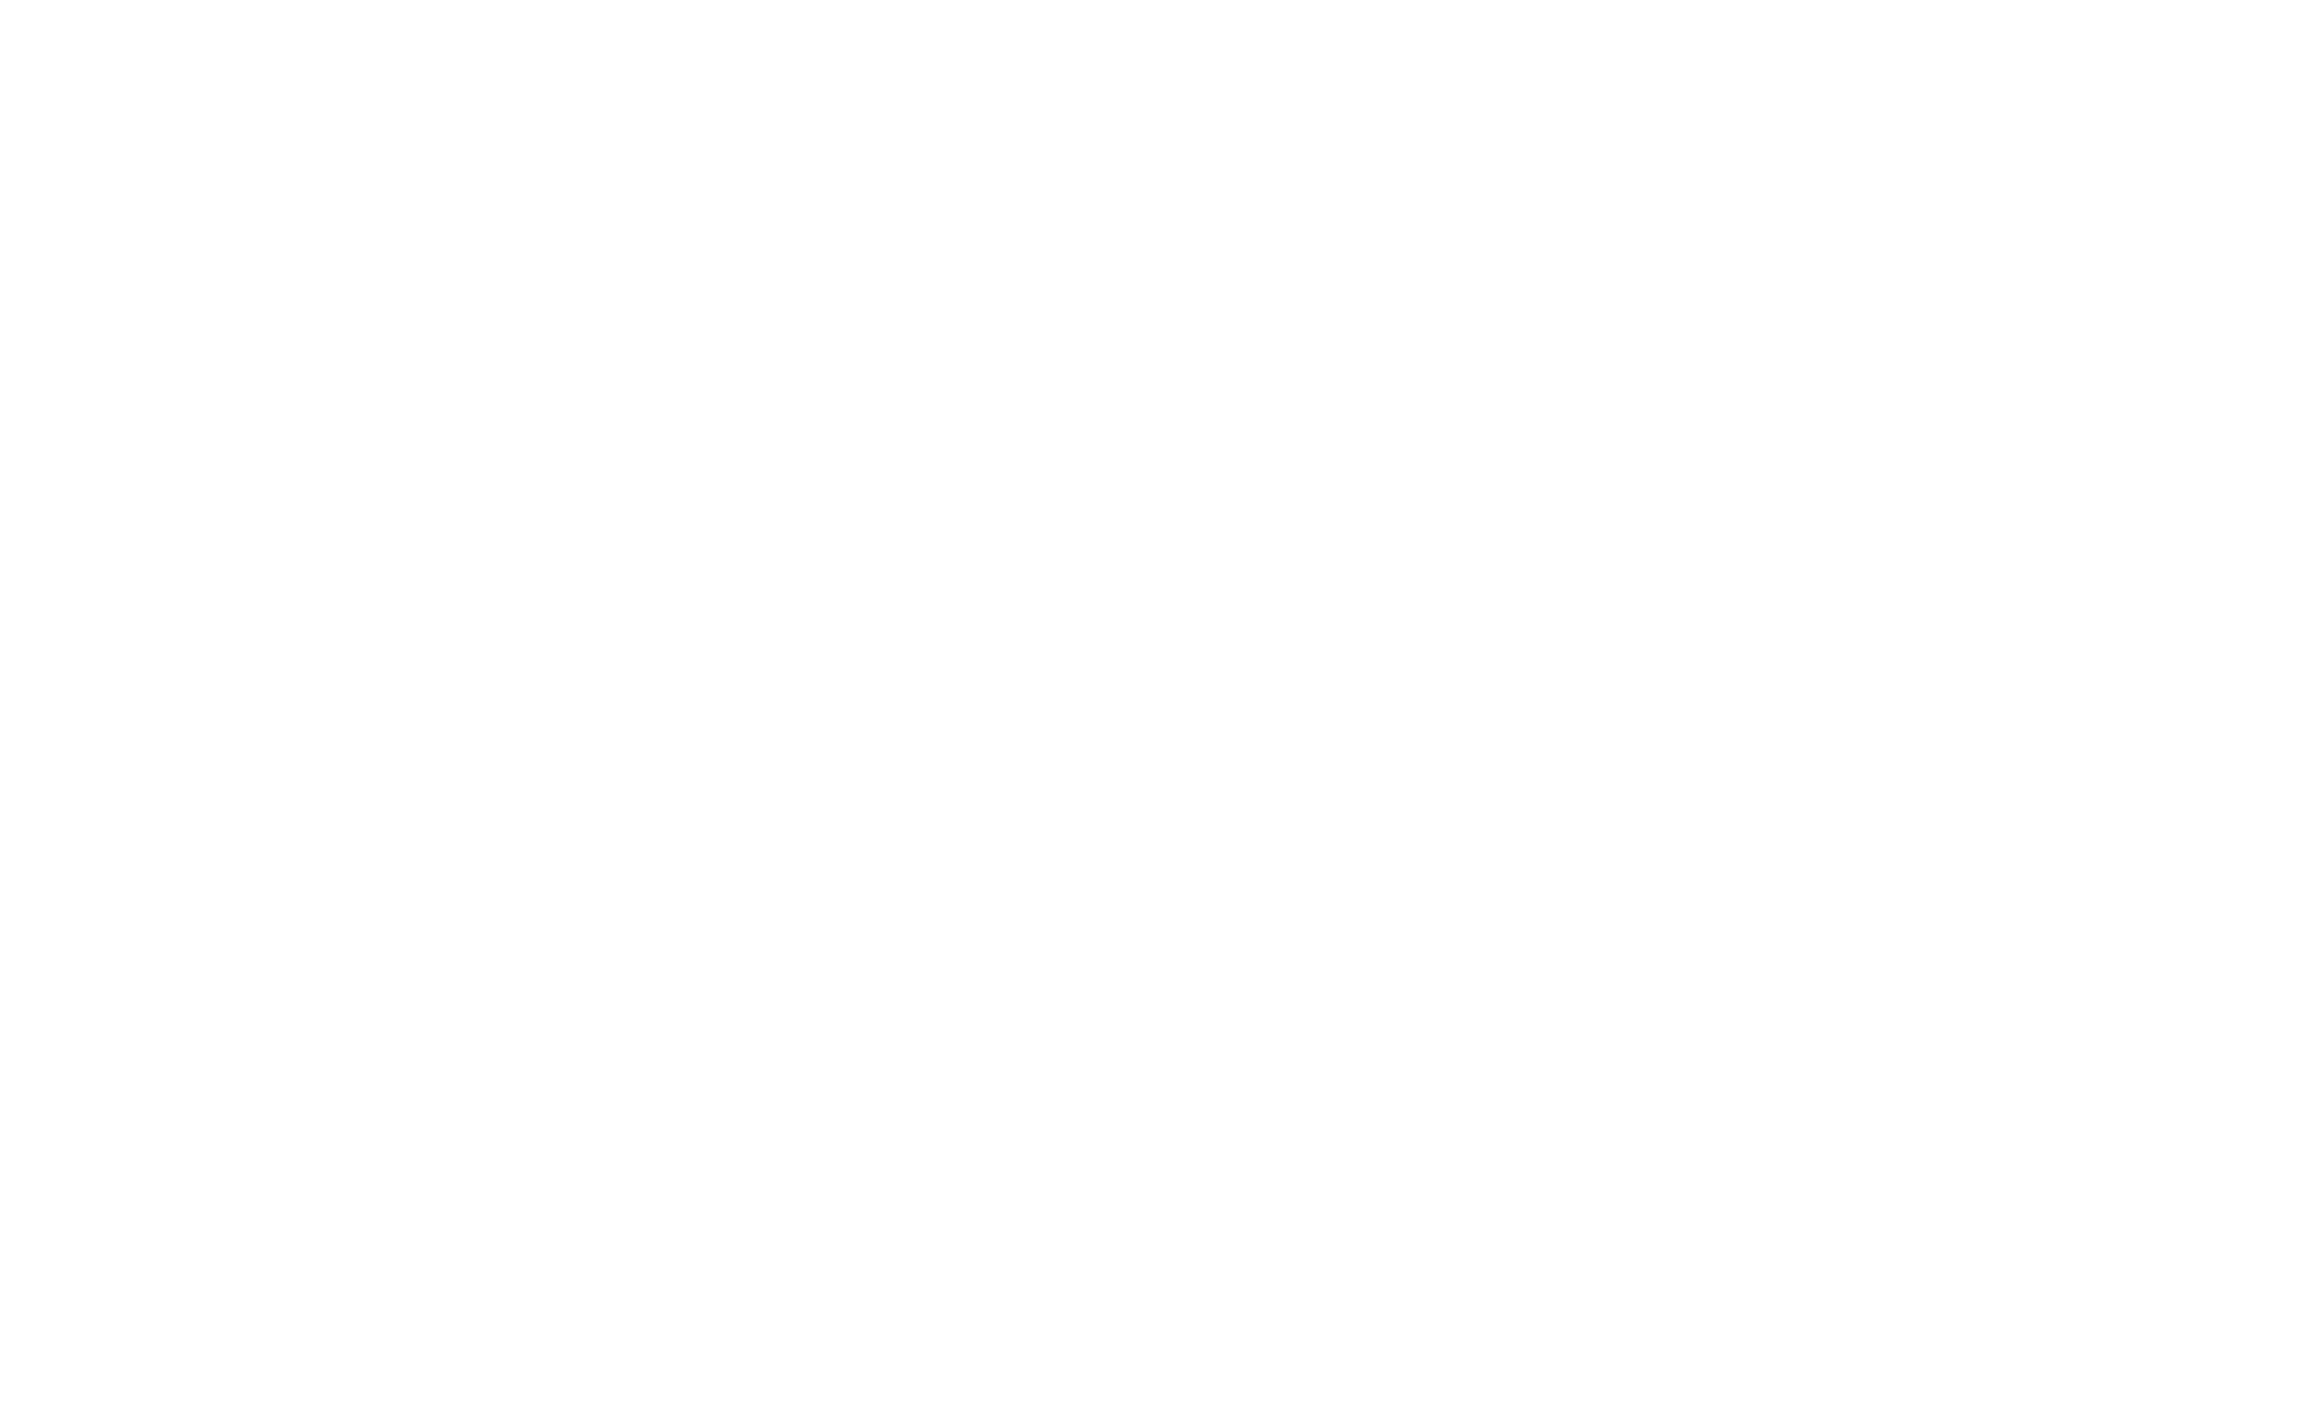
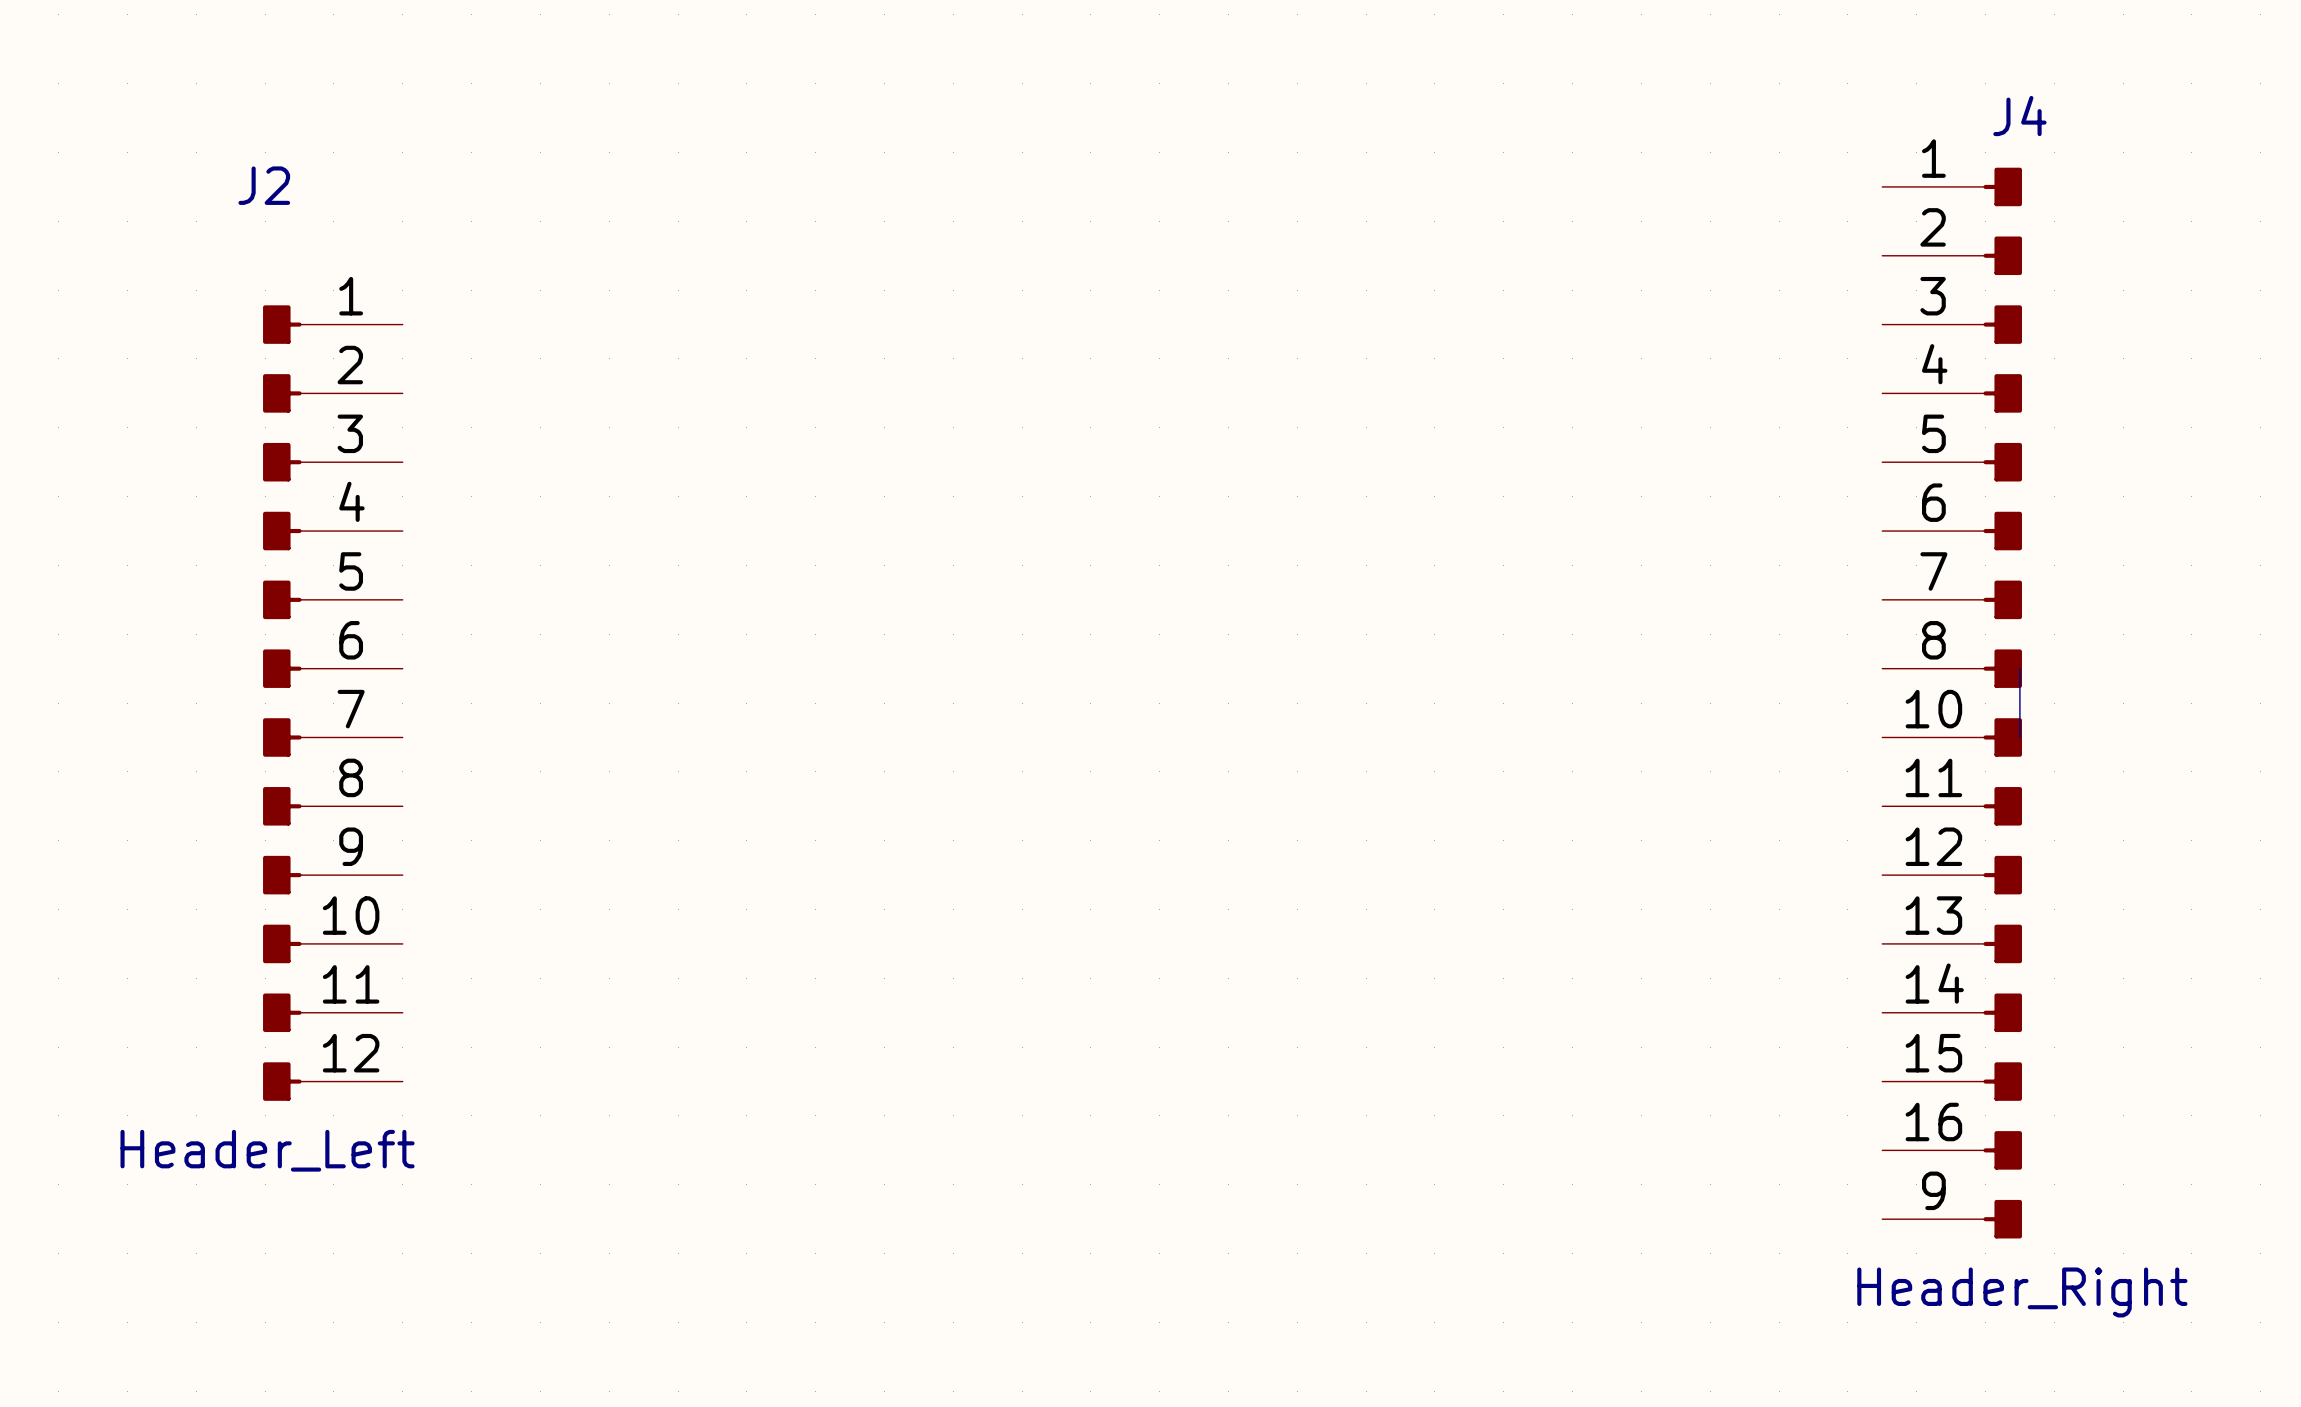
wire: none -> (2019, 668) (2019, 737)
J2: none -> Header_Left (332, 703)
J4: none -> Header_Right (1952, 703)

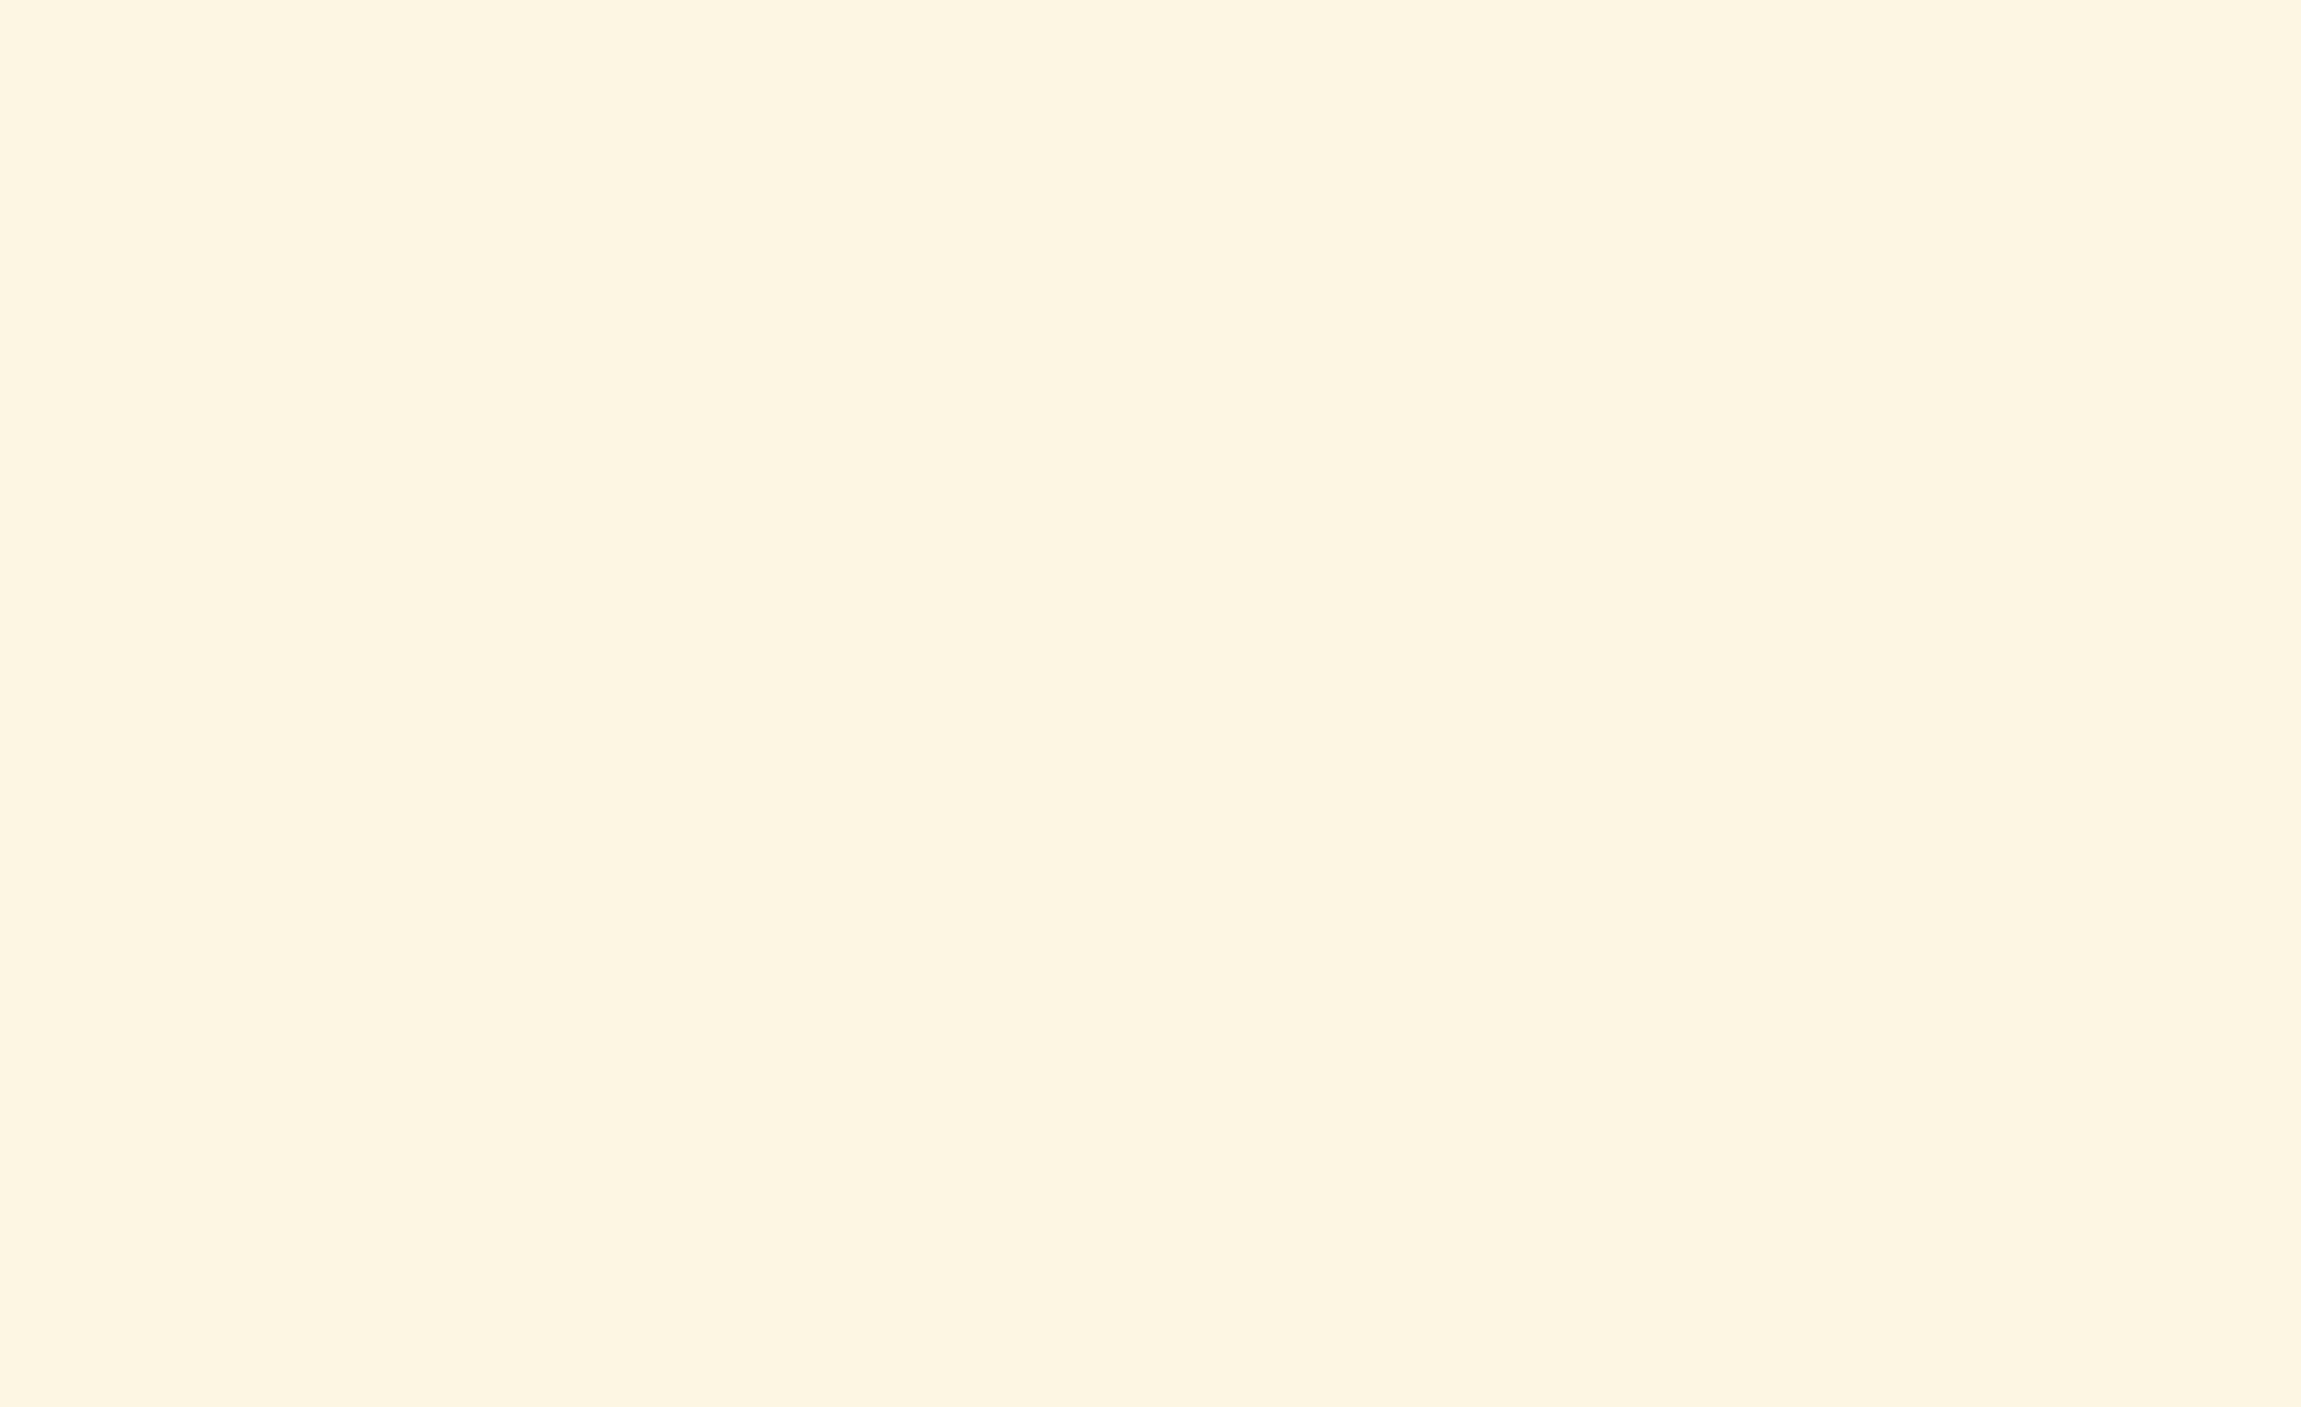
wire: (2019, 668) (2019, 737) -> none
J2: Header_Left (332, 703) -> none
J4: Header_Right (1952, 703) -> none

